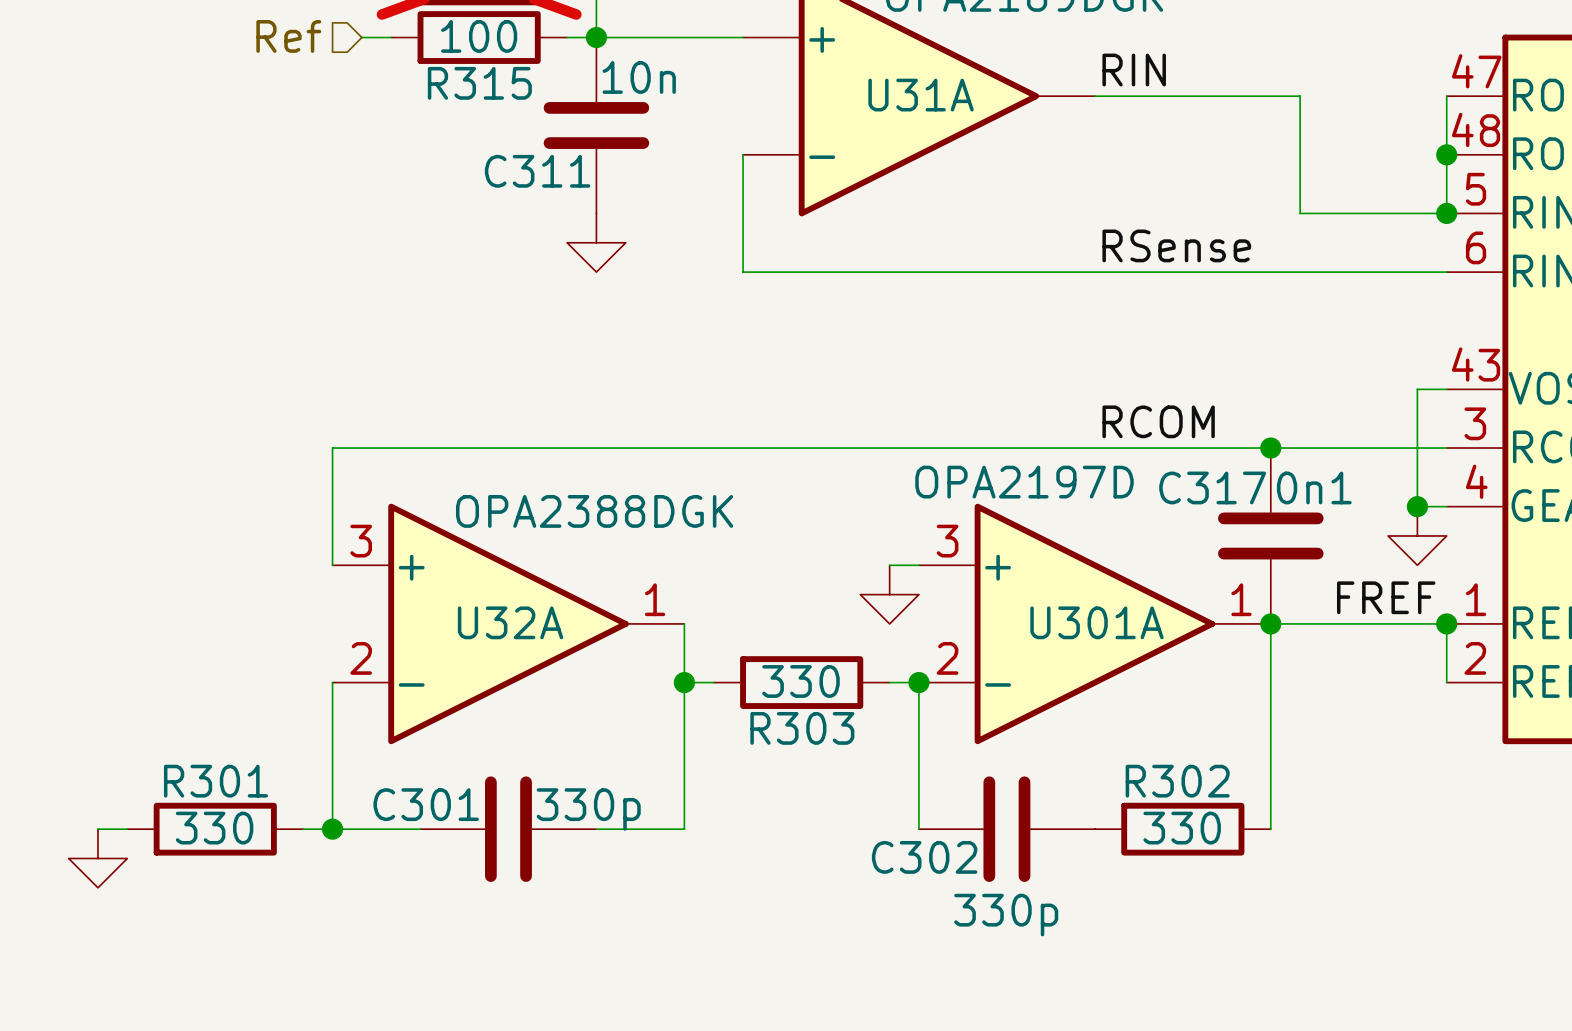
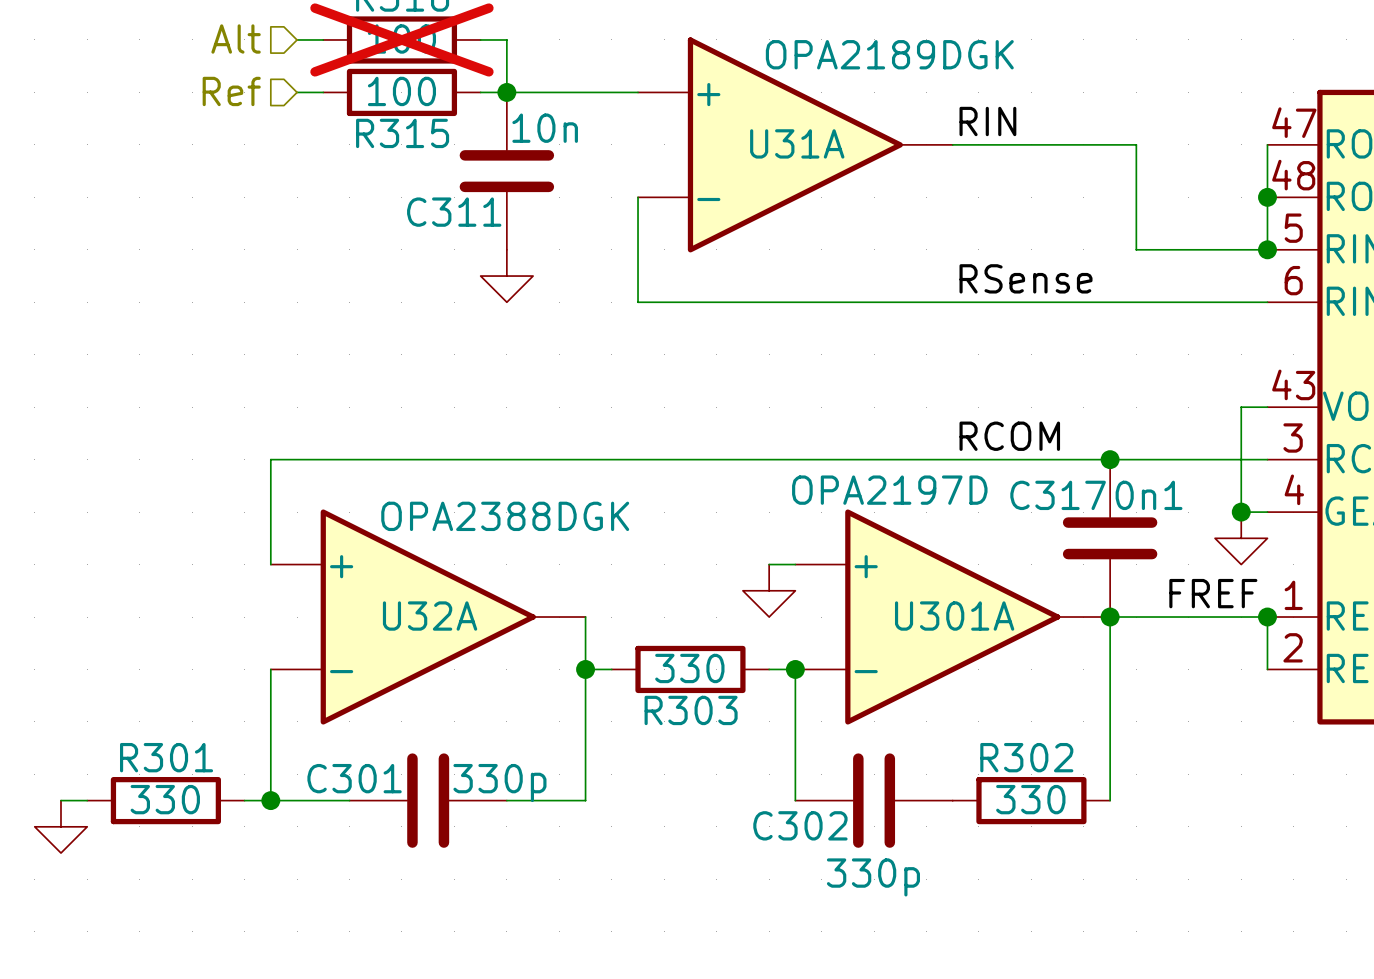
U32A pin number: 3 (361, 541) -> none
U301A pin number: 3 (947, 541) -> none
U32A pin number: 1 (655, 599) -> none
U301A pin number: 1 (1241, 599) -> none
U32A pin number: 2 (361, 658) -> none
U301A pin number: 2 (947, 658) -> none

